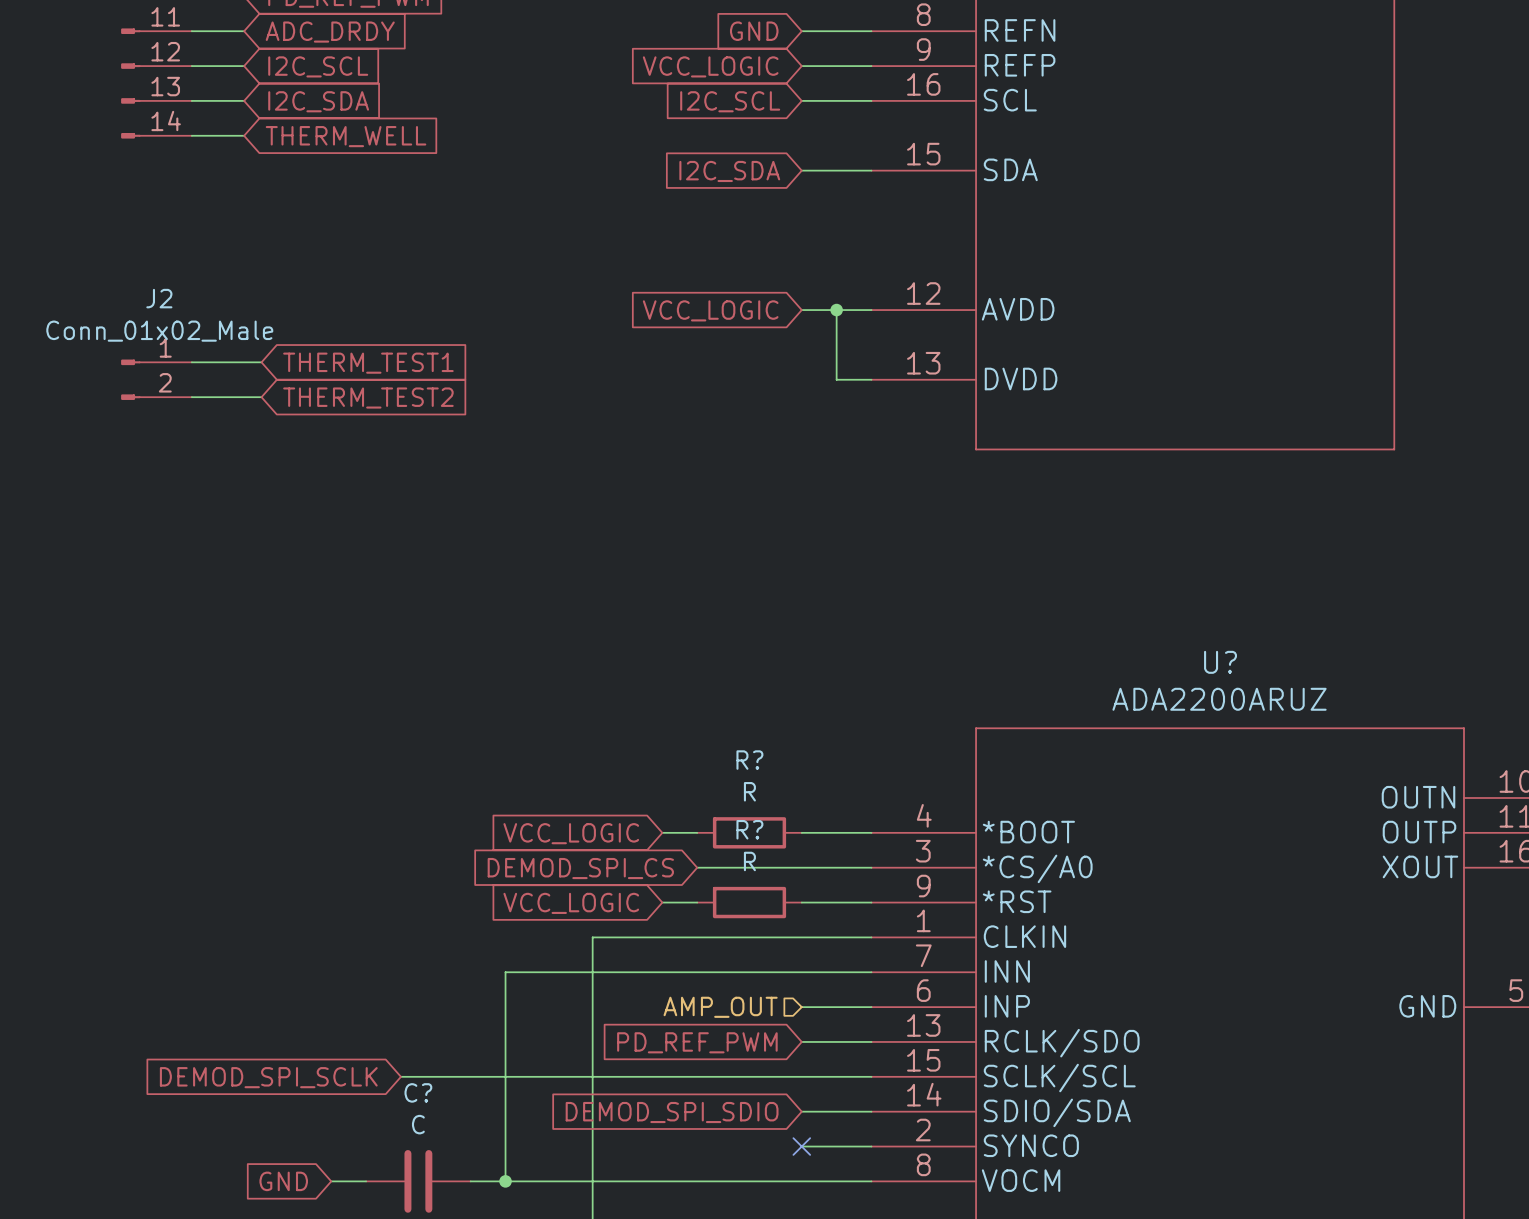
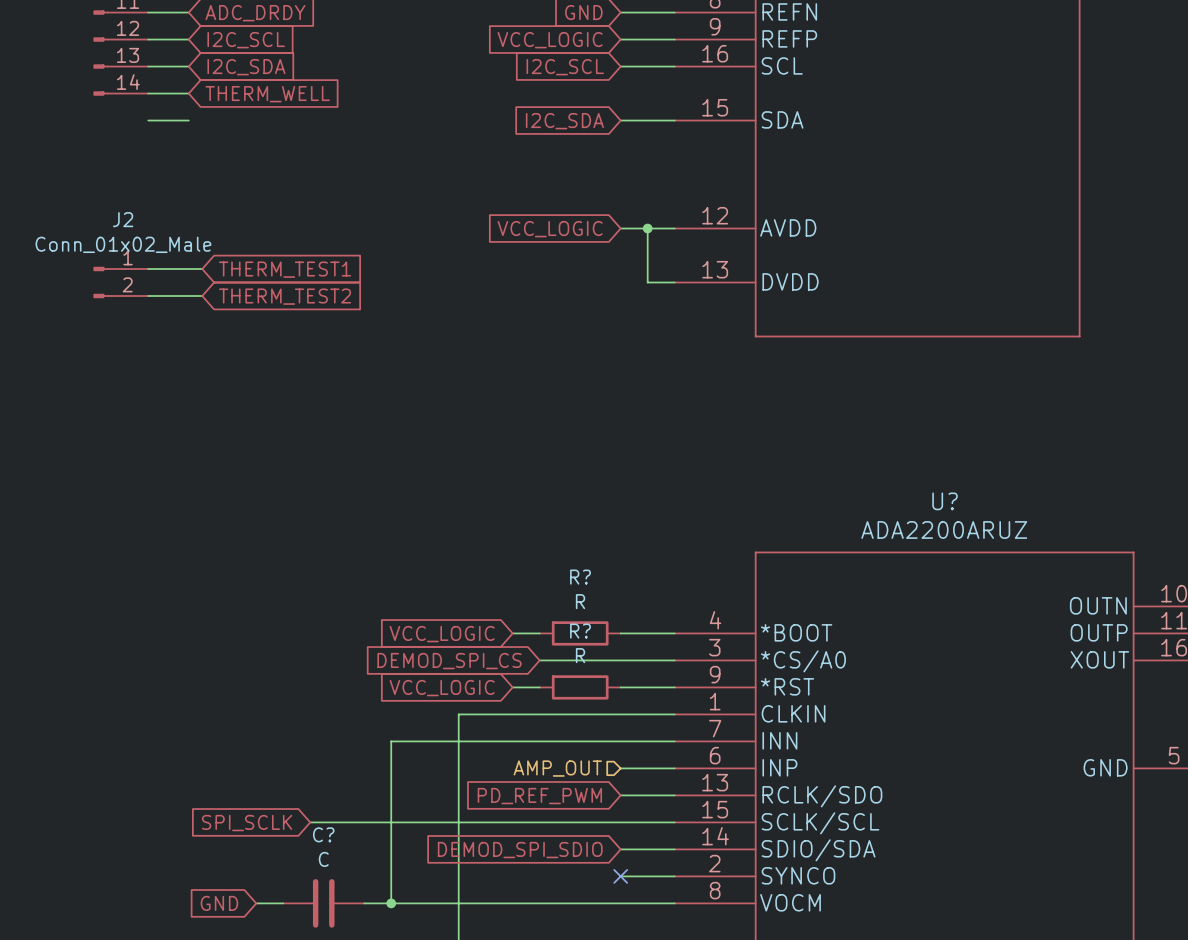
wire: none -> (148, 120) (188, 120)
global label: DEMOD_SPI_SCLK (268, 1077) -> SPI_SCLK (247, 823)

